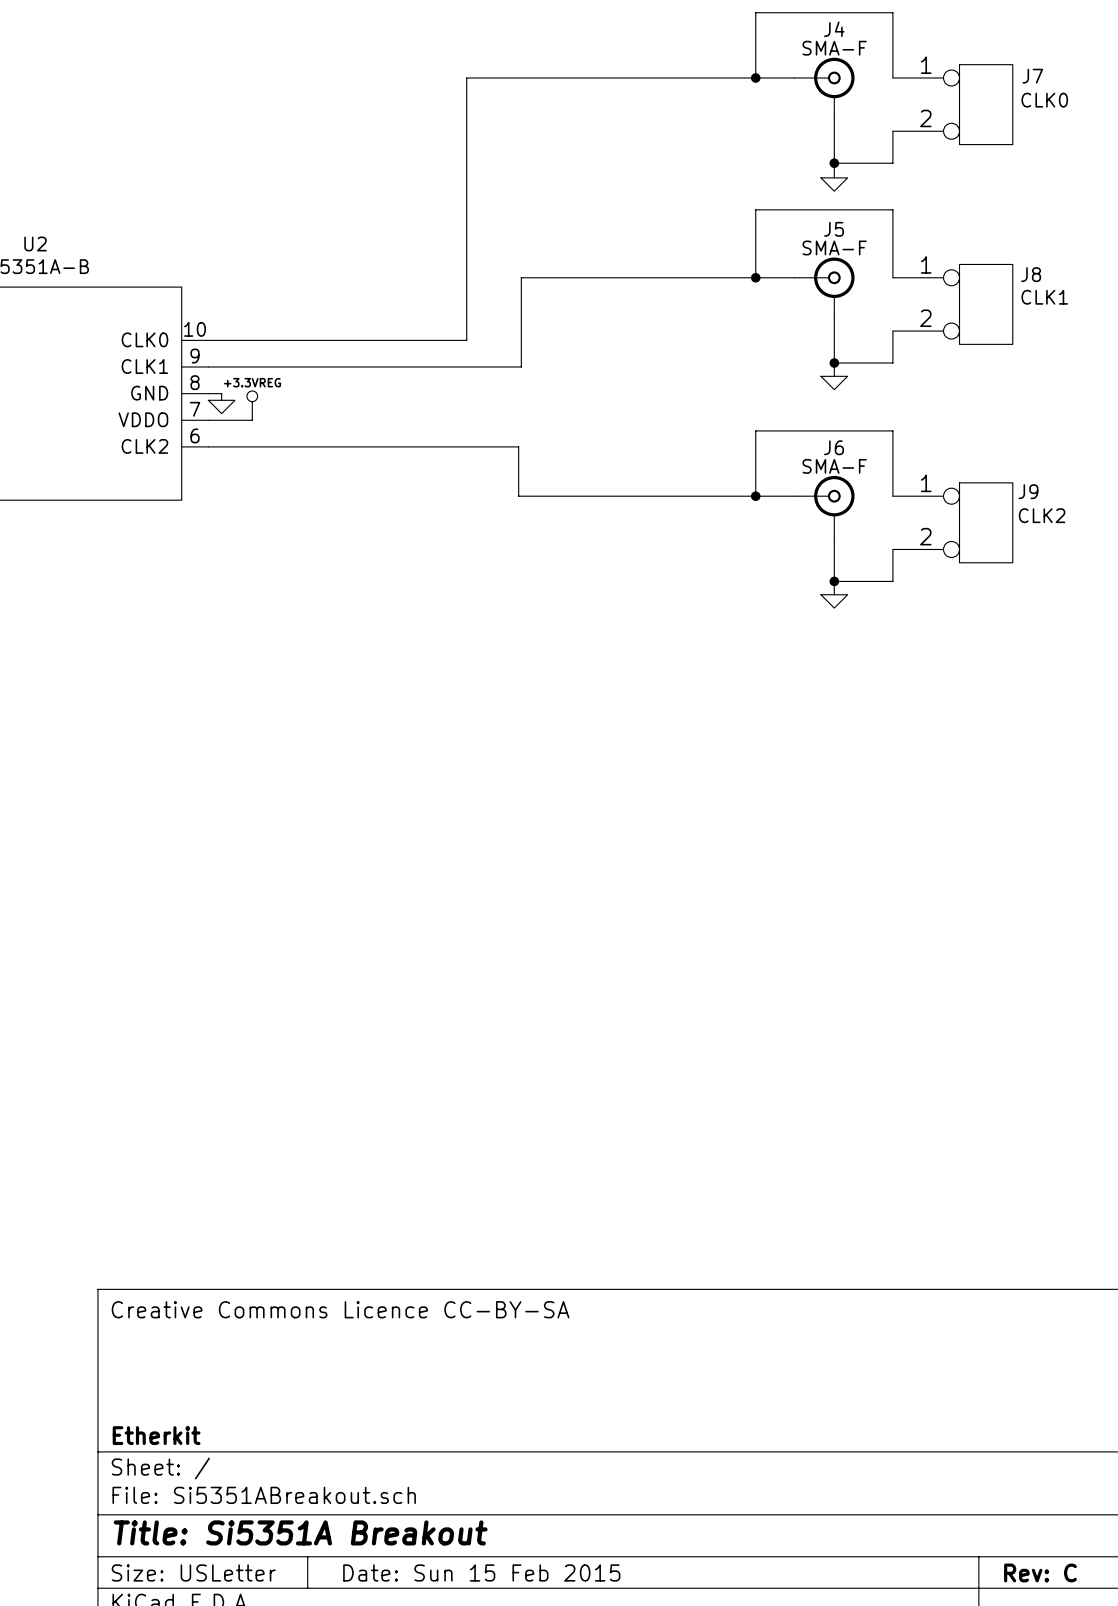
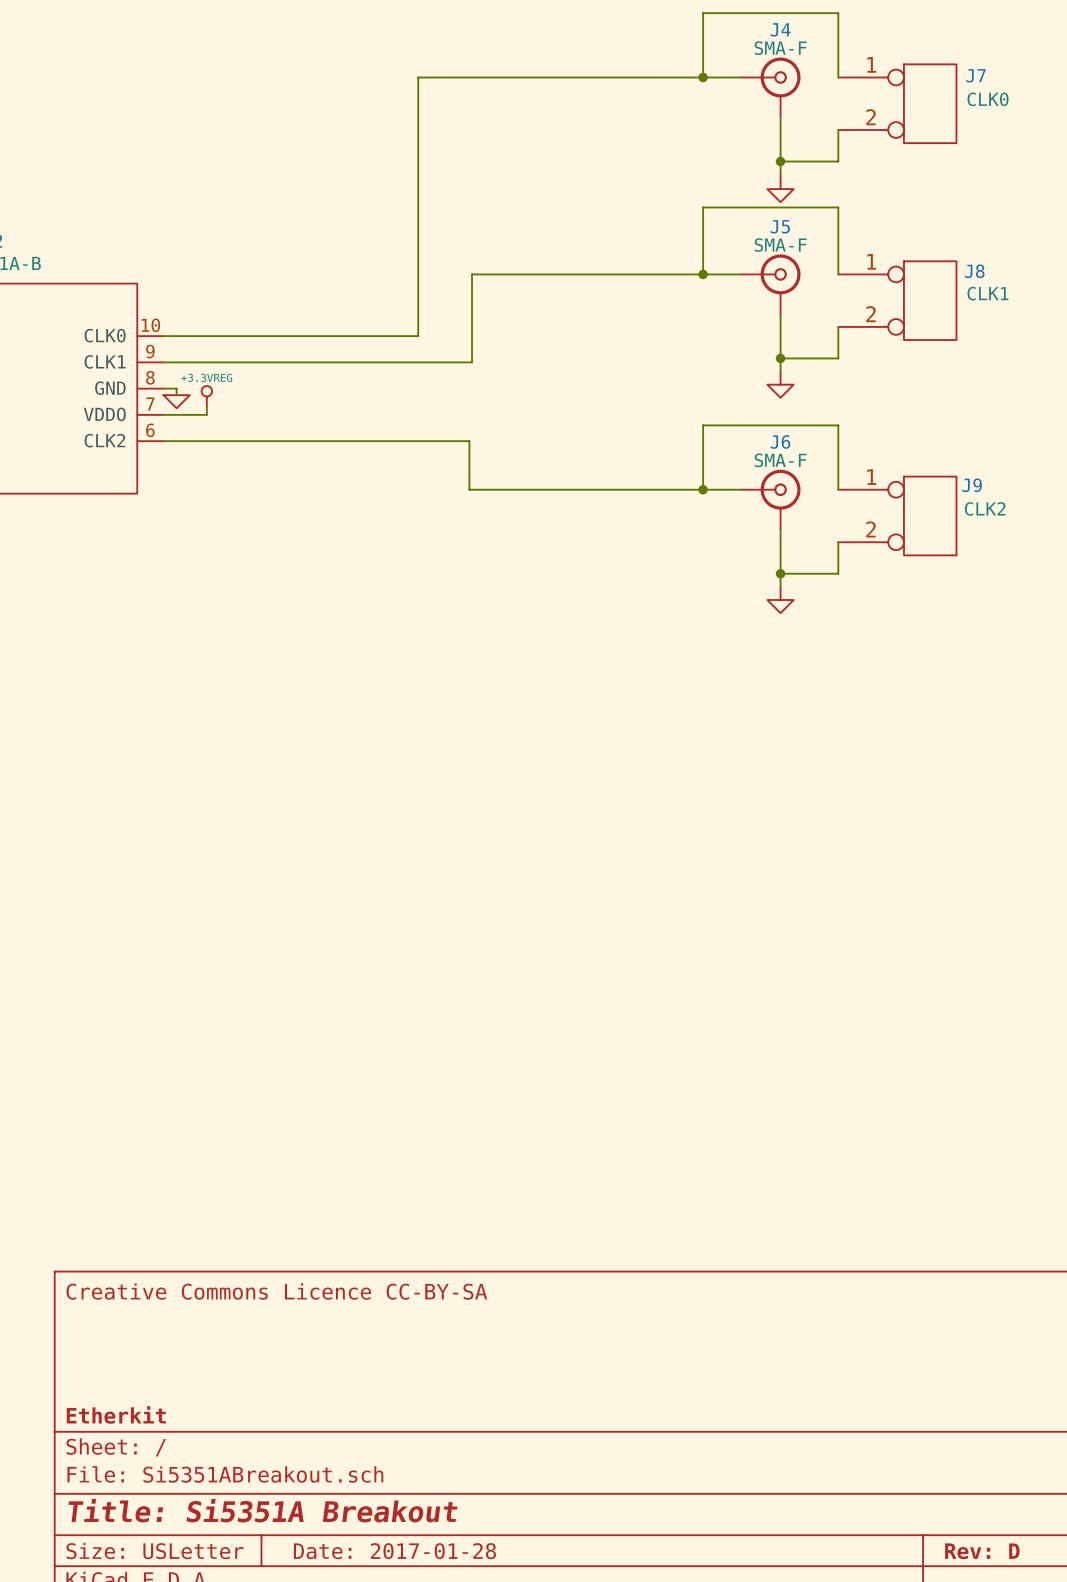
power symbol shape: [820, 177, 848, 192] -> [767, 175, 794, 203]
power symbol shape: [820, 376, 848, 390] -> [767, 371, 794, 398]
power symbol shape: [820, 594, 848, 609] -> [767, 586, 794, 614]
title block: Date: Sun 15 Feb 2015 (481, 1572) -> Date: 2017-01-28 (394, 1551)
title block: Rev: C (1040, 1572) -> Rev: D (982, 1551)

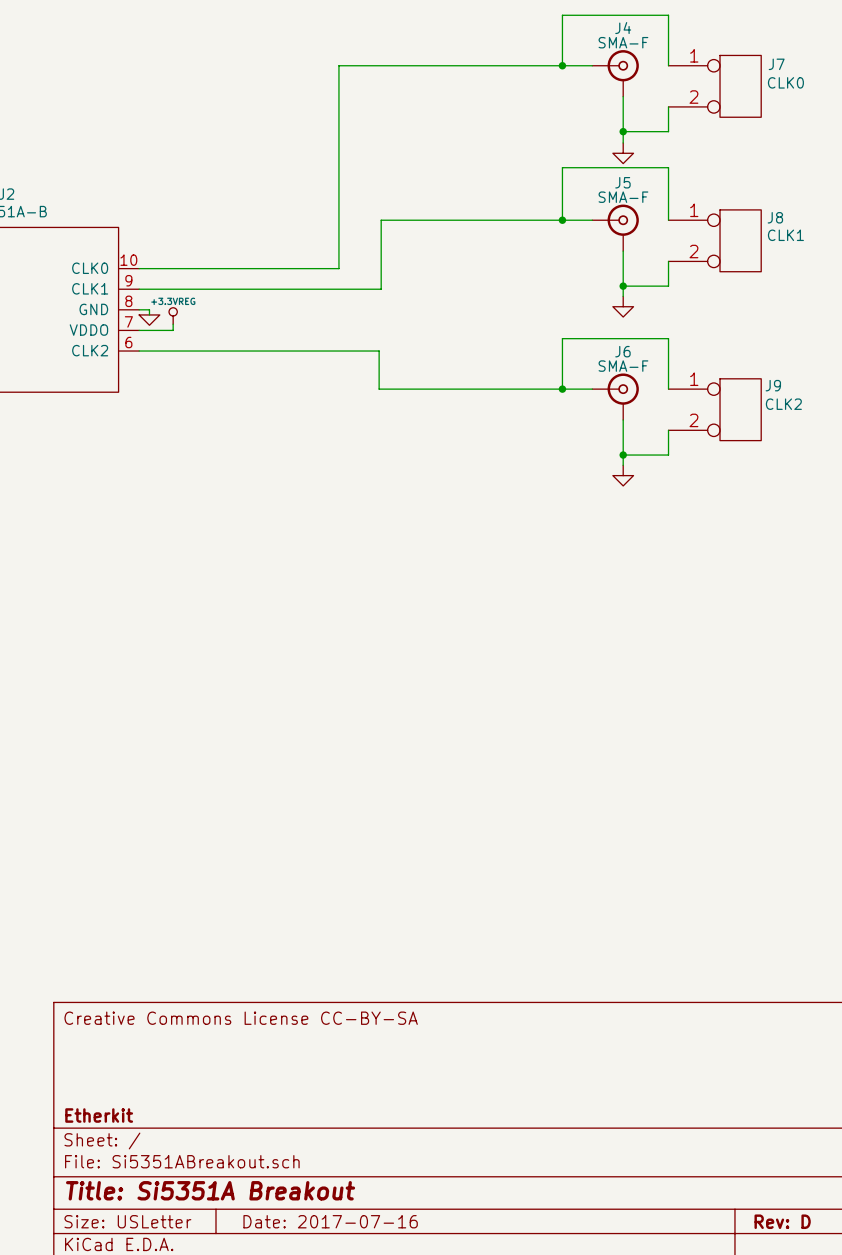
title block: Creative Commons Licence CC-BY-SA (276, 1291) -> Creative Commons License CC-BY-SA (241, 1018)
title block: Date: 2017-01-28 (394, 1551) -> Date: 2017-07-16 (330, 1221)

